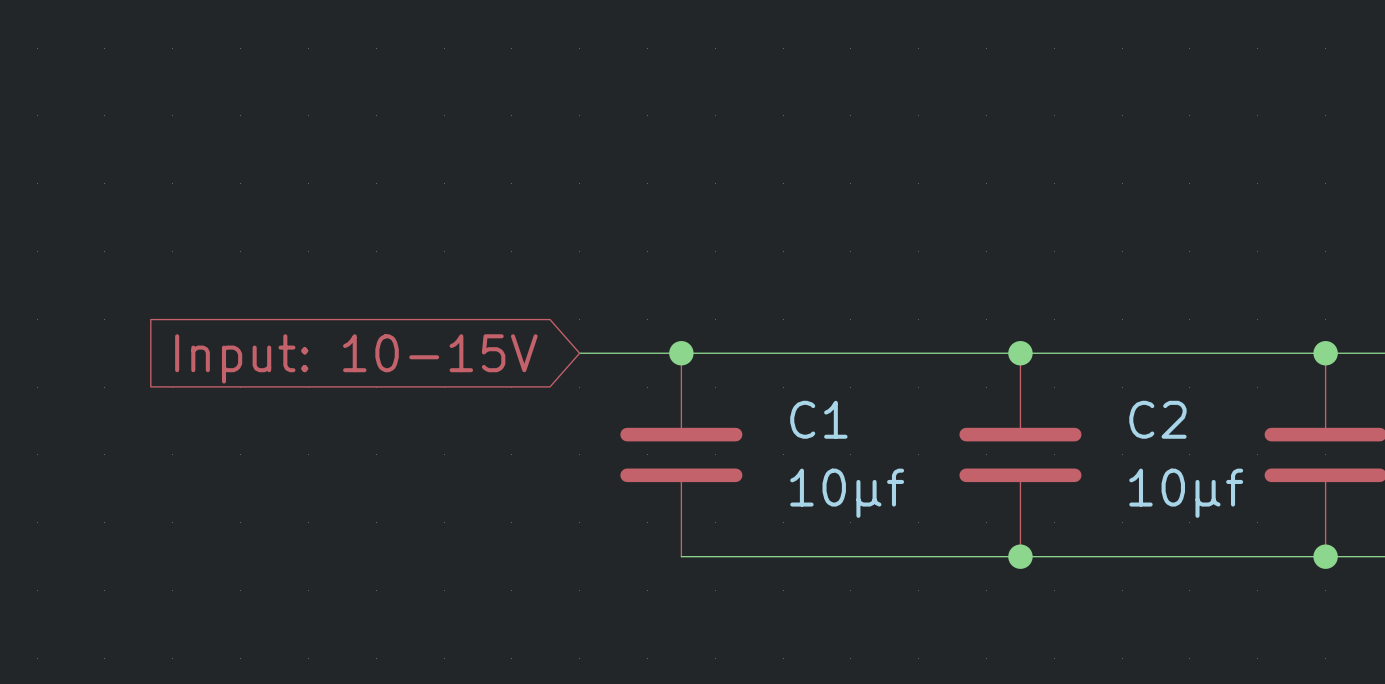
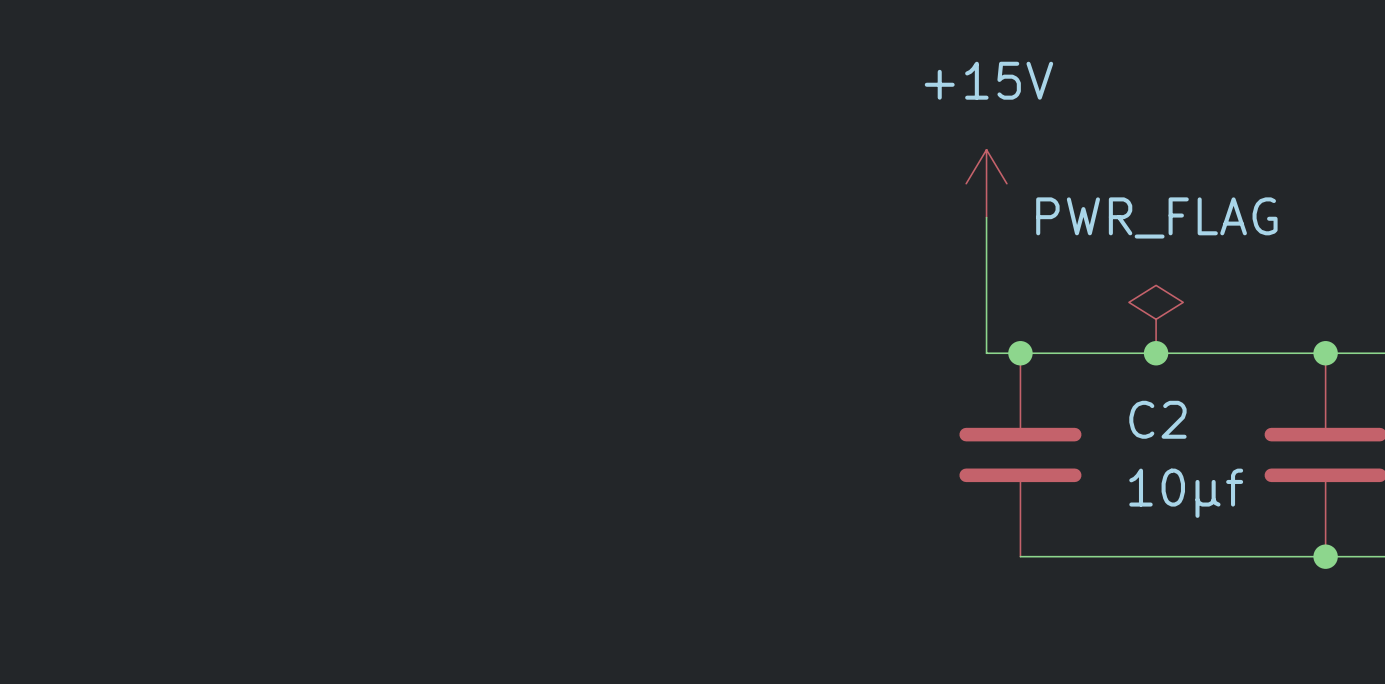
power symbol: none -> +15V (986, 183)
power symbol: none -> PWR_FLAG (1156, 319)
wire: (579, 353) (986, 353) -> (986, 217) (986, 353)
junction: (681, 353) -> none
junction: none -> (1156, 353)
global label: Input: 10-15V (356, 358) -> none
C1: 10μf (681, 454) -> none
wire: (681, 556) (1020, 556) -> none
junction: (1020, 556) -> none

